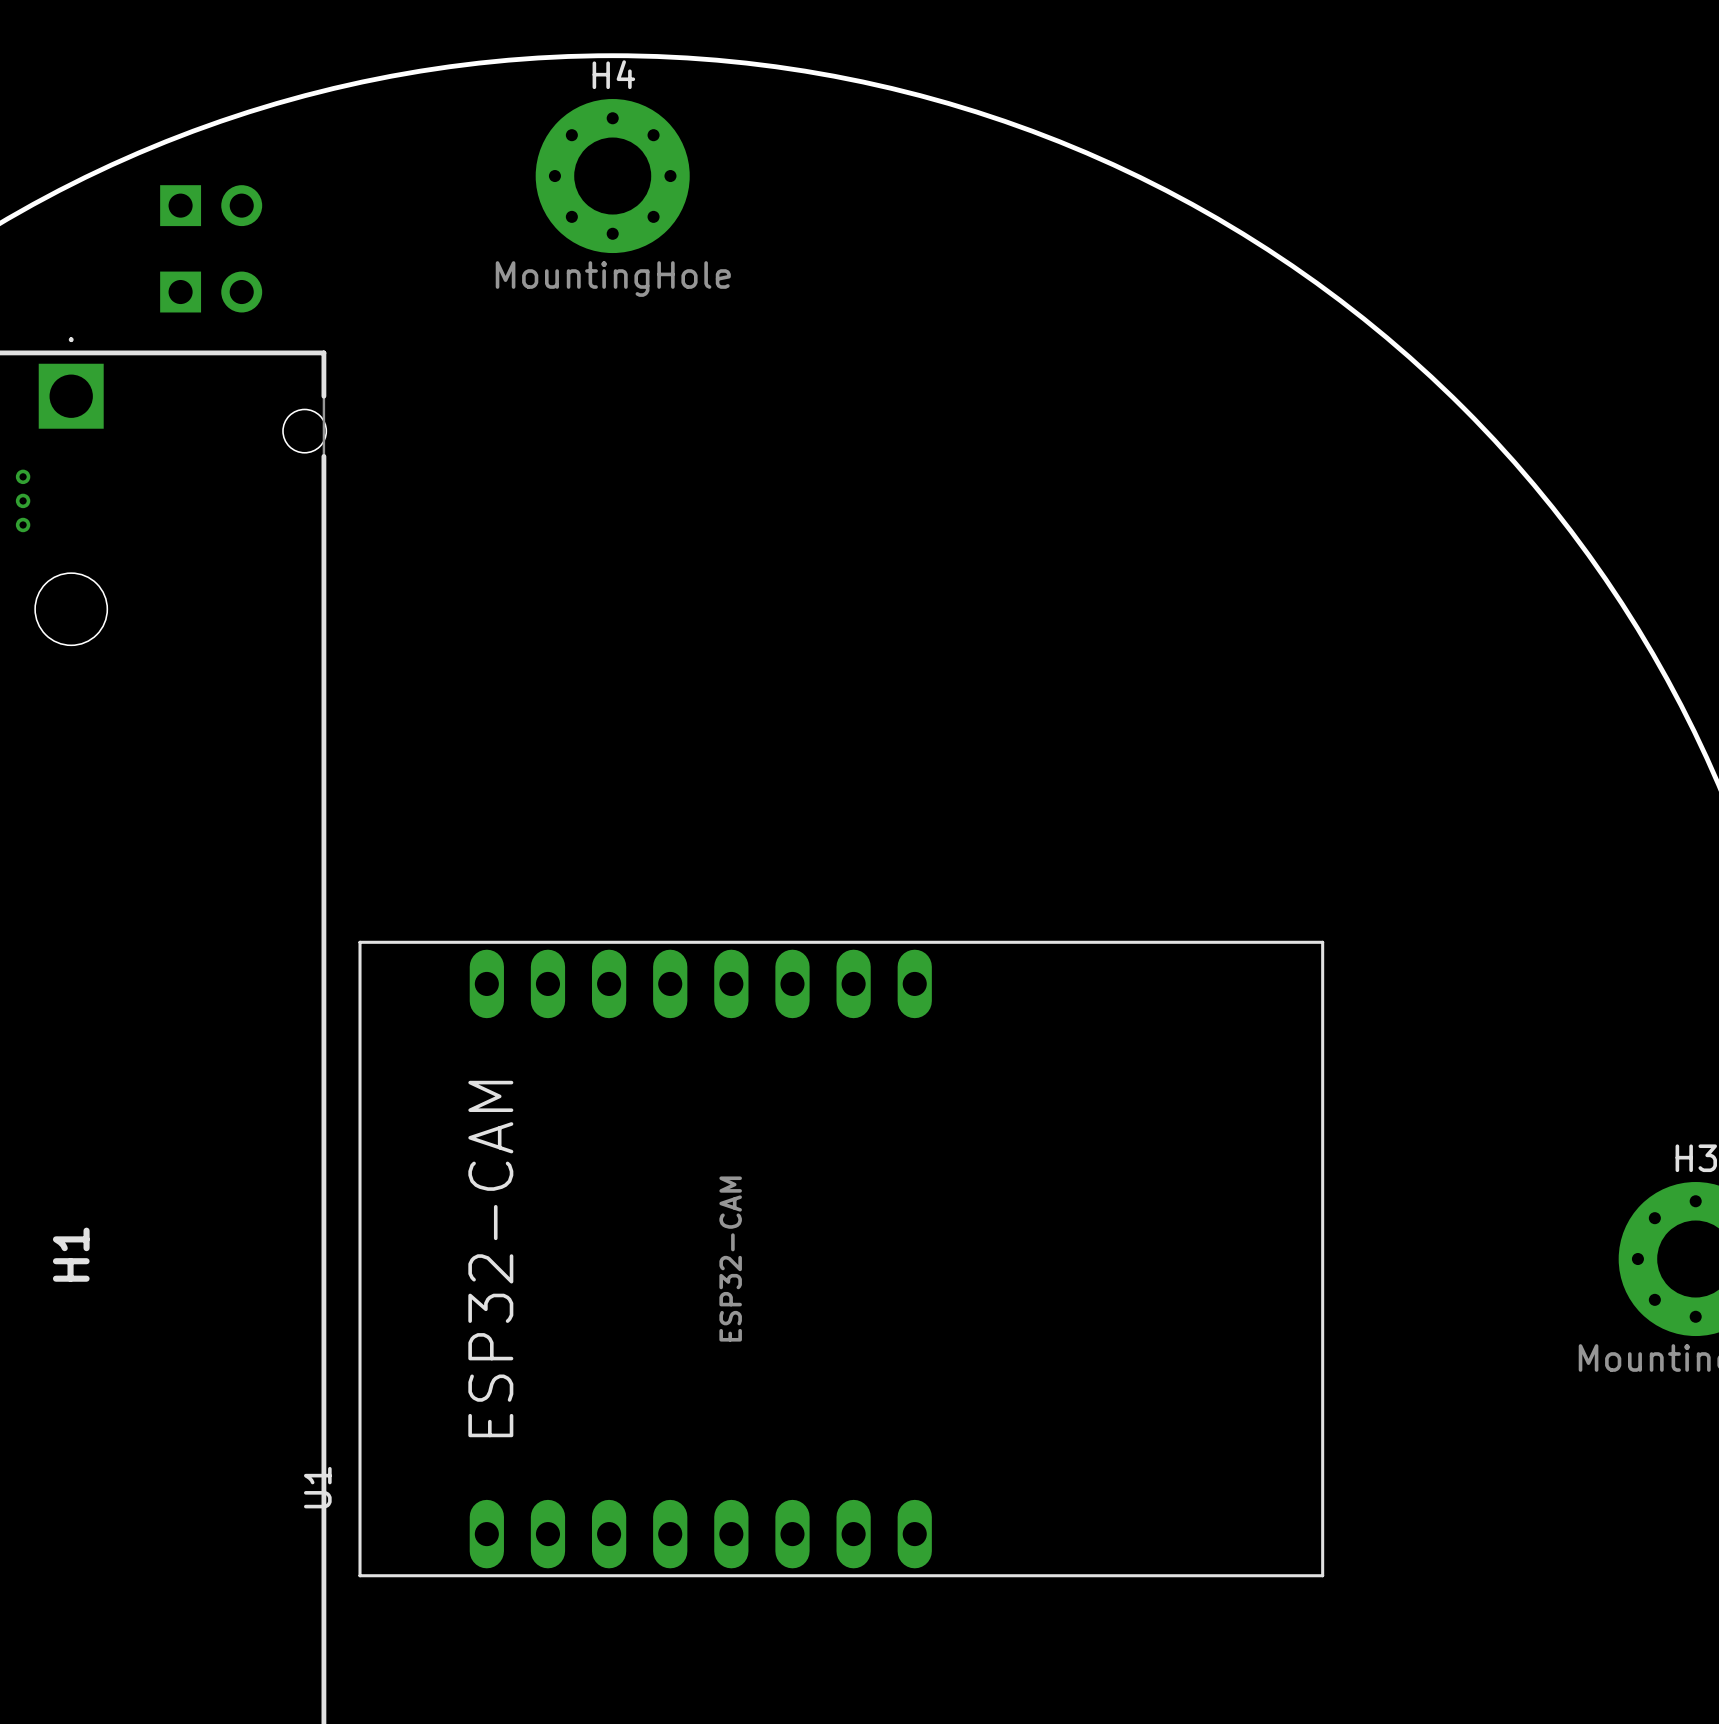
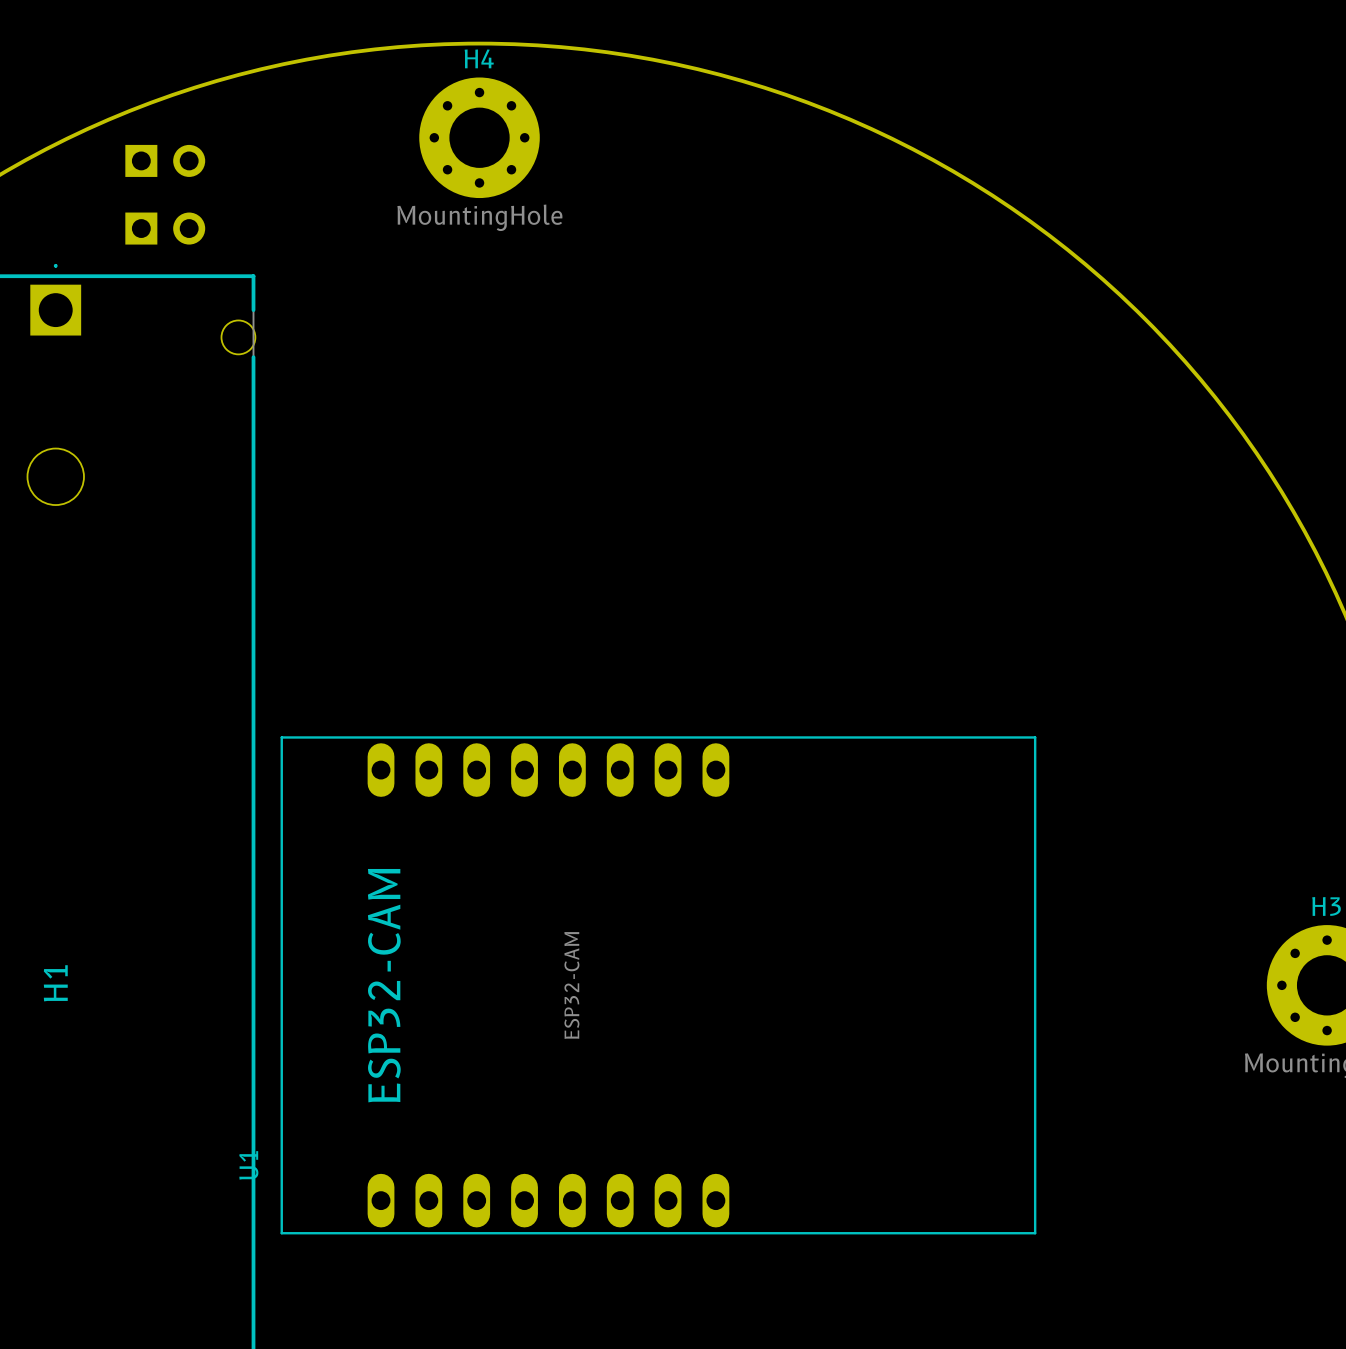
via: (23, 476) -> none
via: (23, 500) -> none
via: (23, 524) -> none

